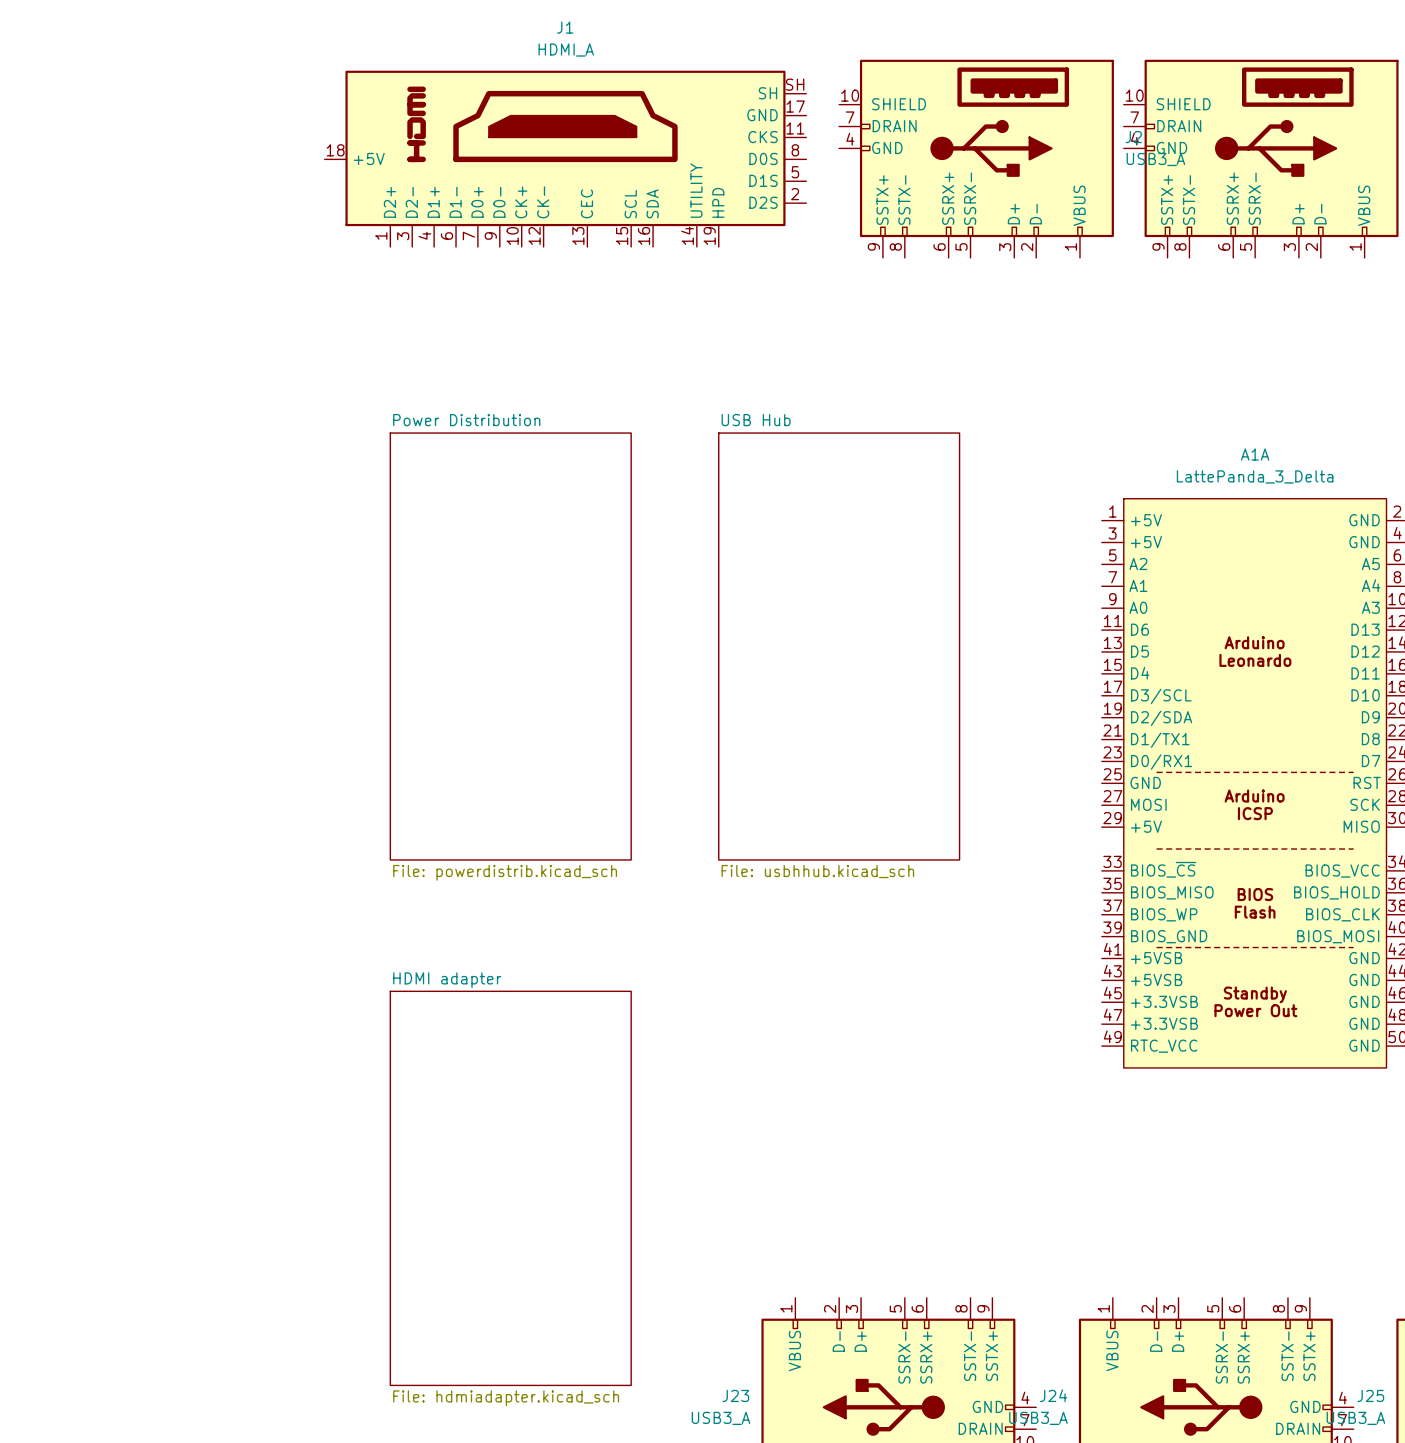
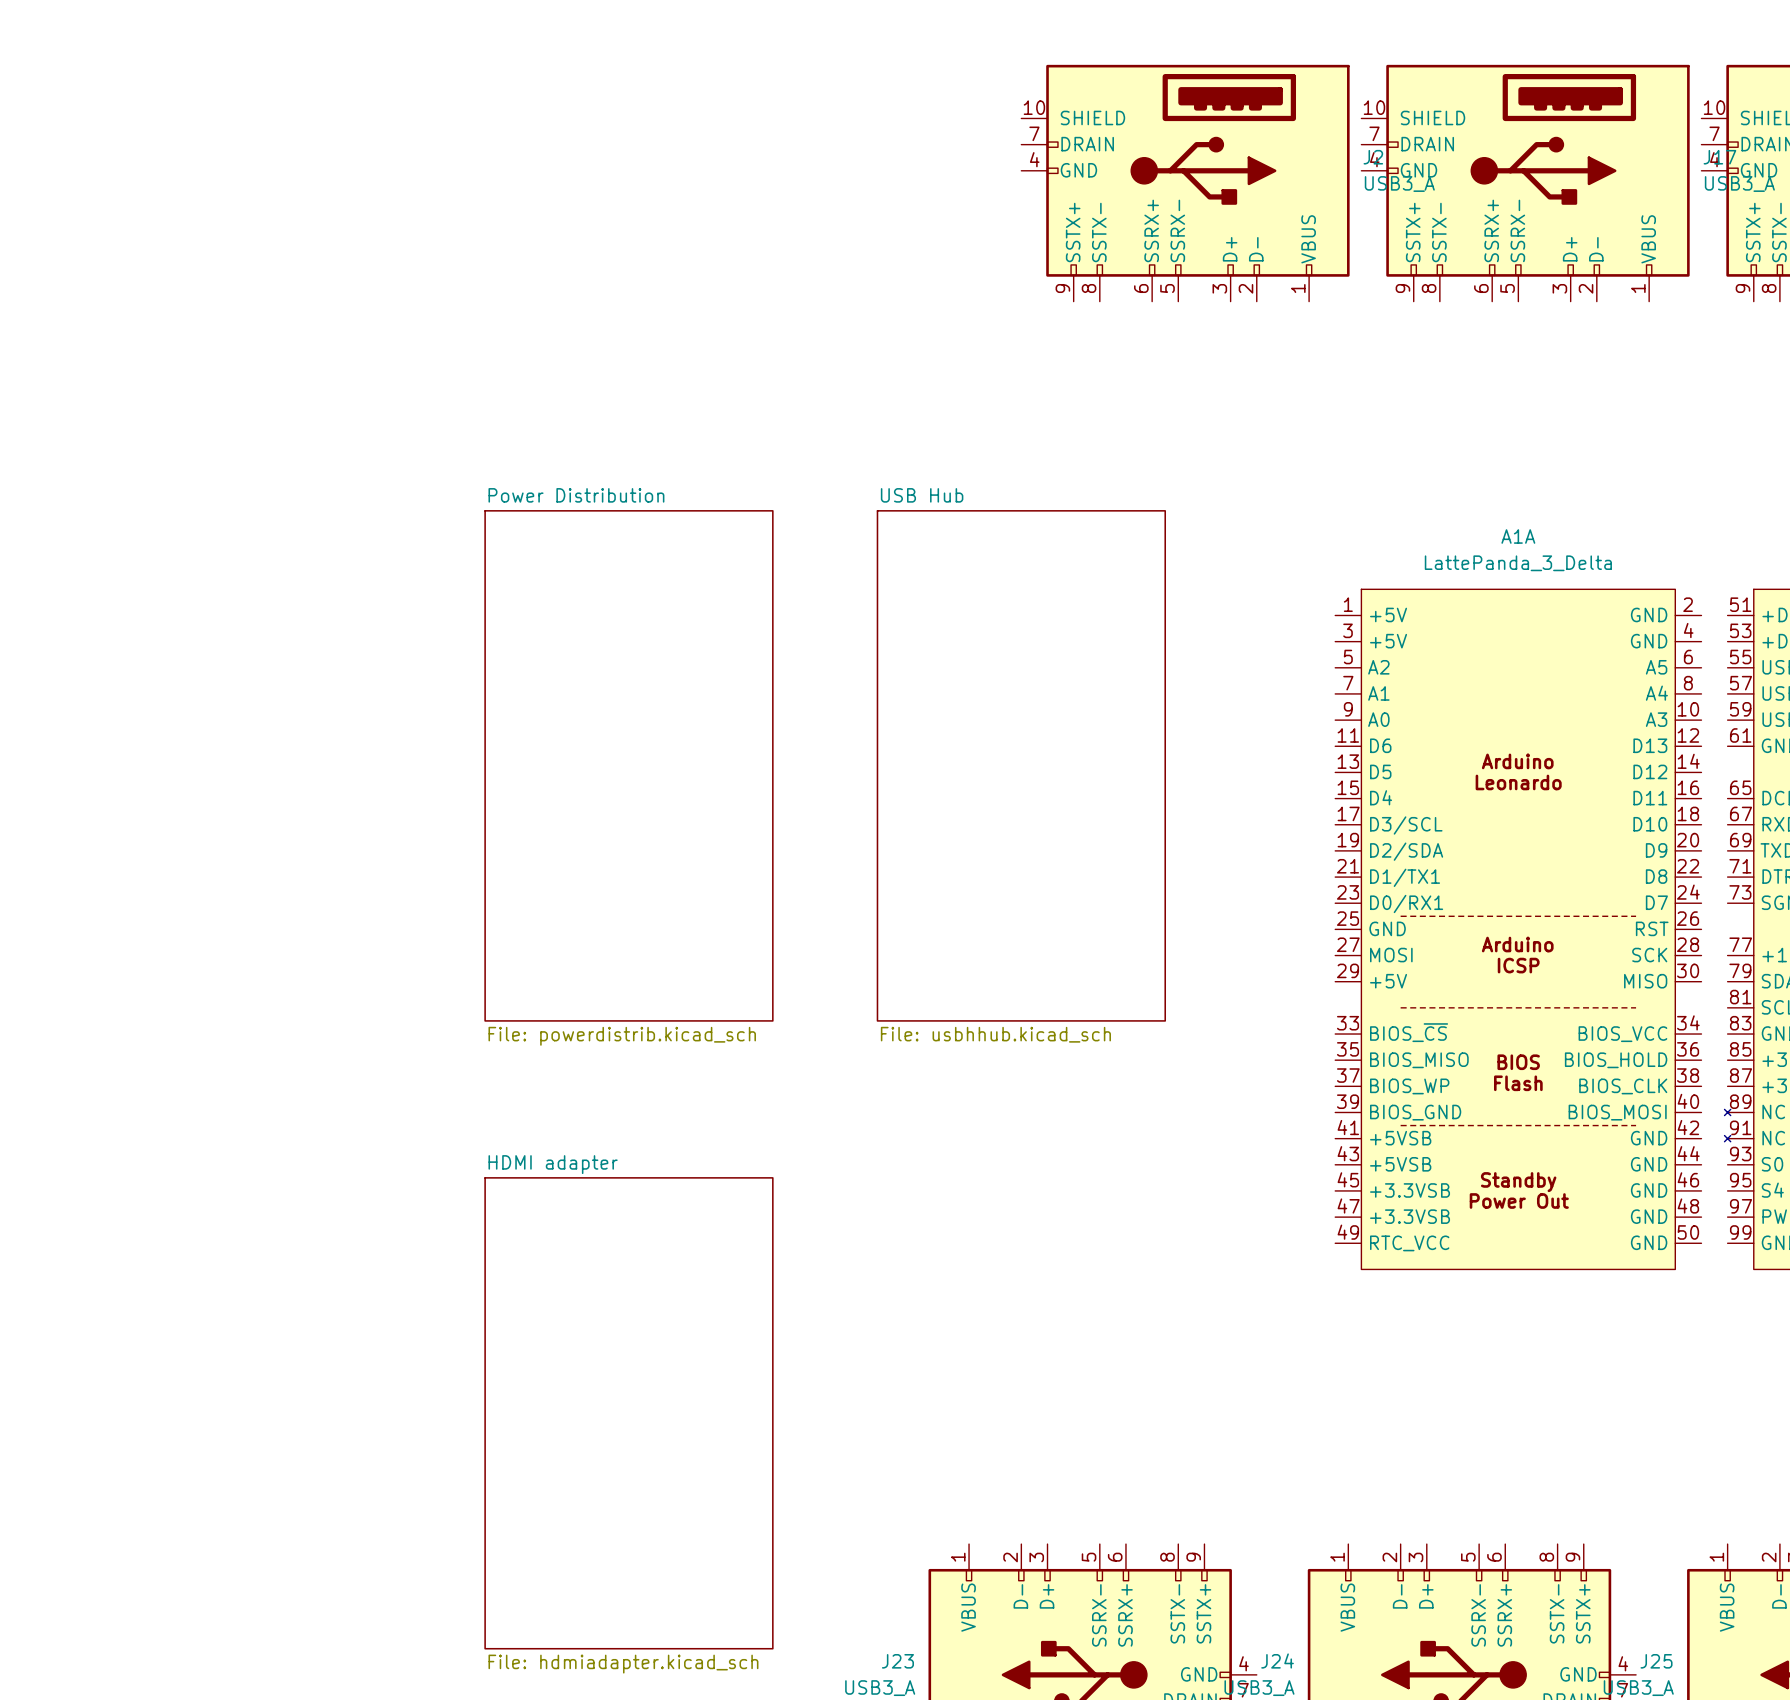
J1: HDMI_A (565, 158) -> none

